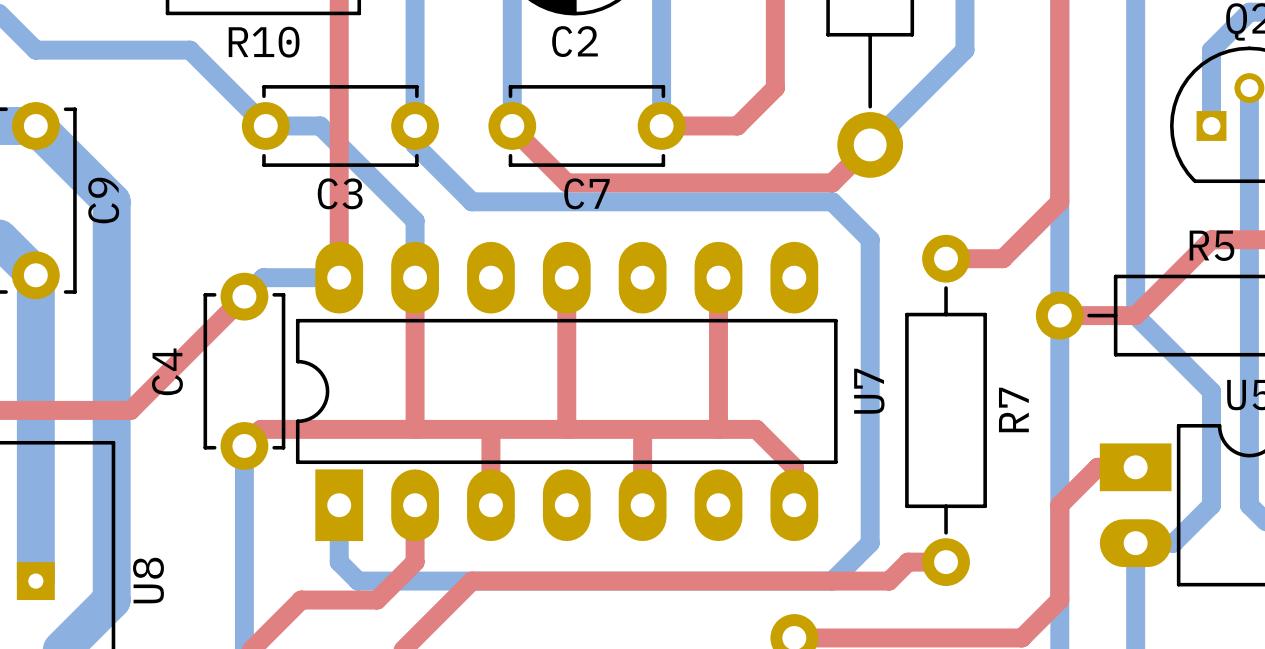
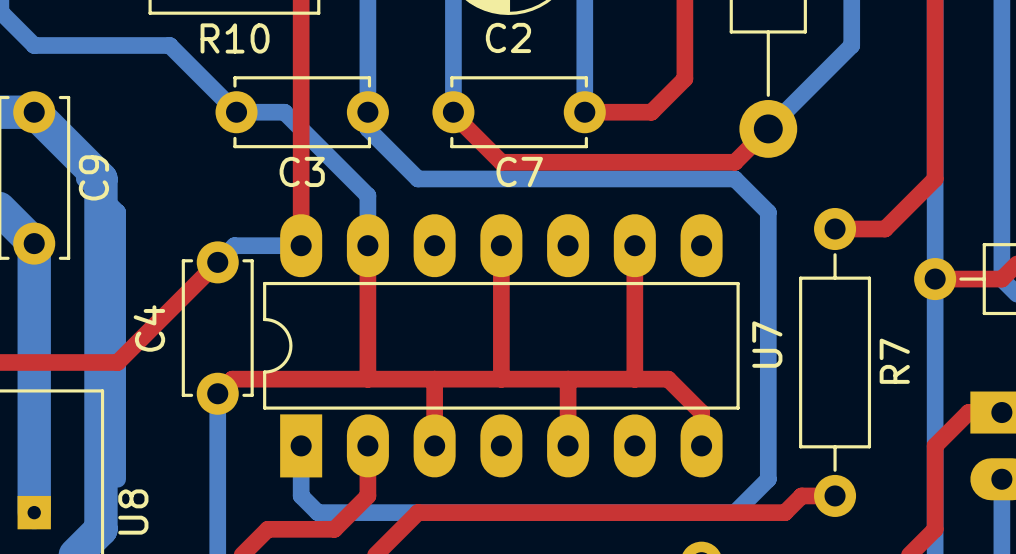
bottom track: none -> (84, 178) (117, 212) (117, 479)

